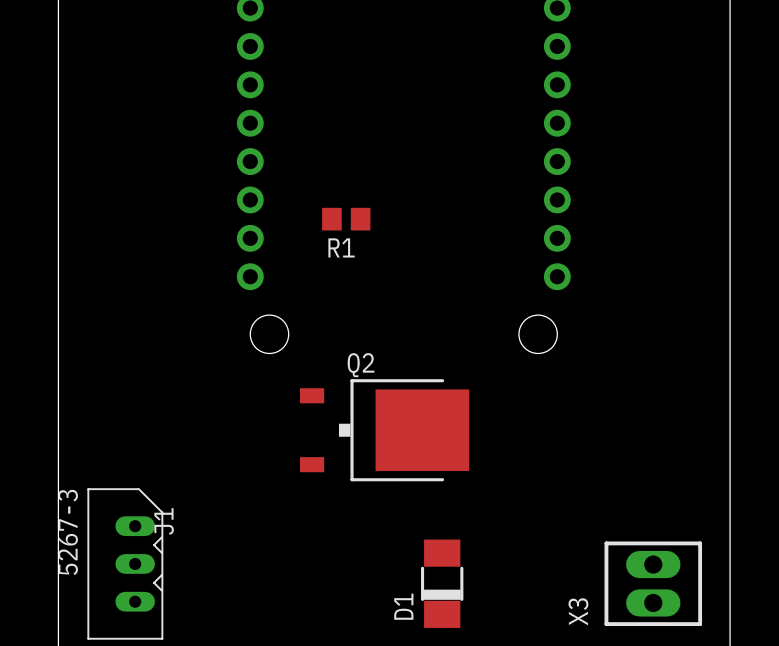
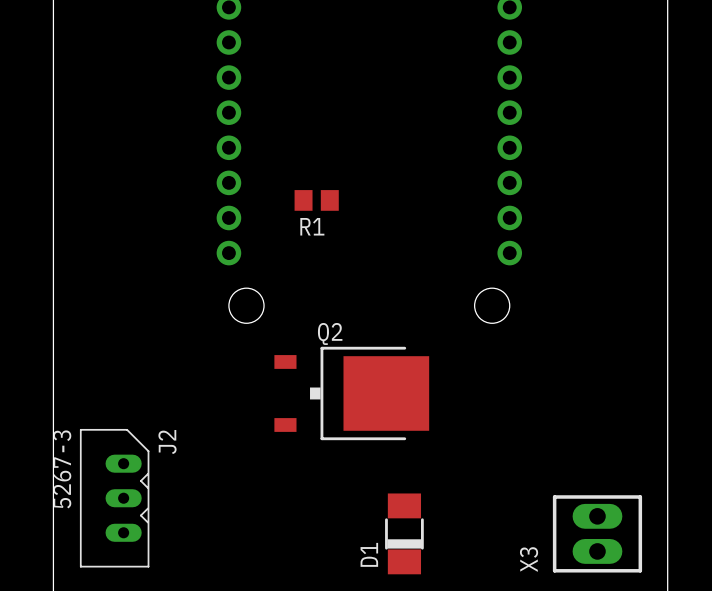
J2: none -> 5267-3 (114, 498)
J1: 5267-3 (125, 563) -> none

